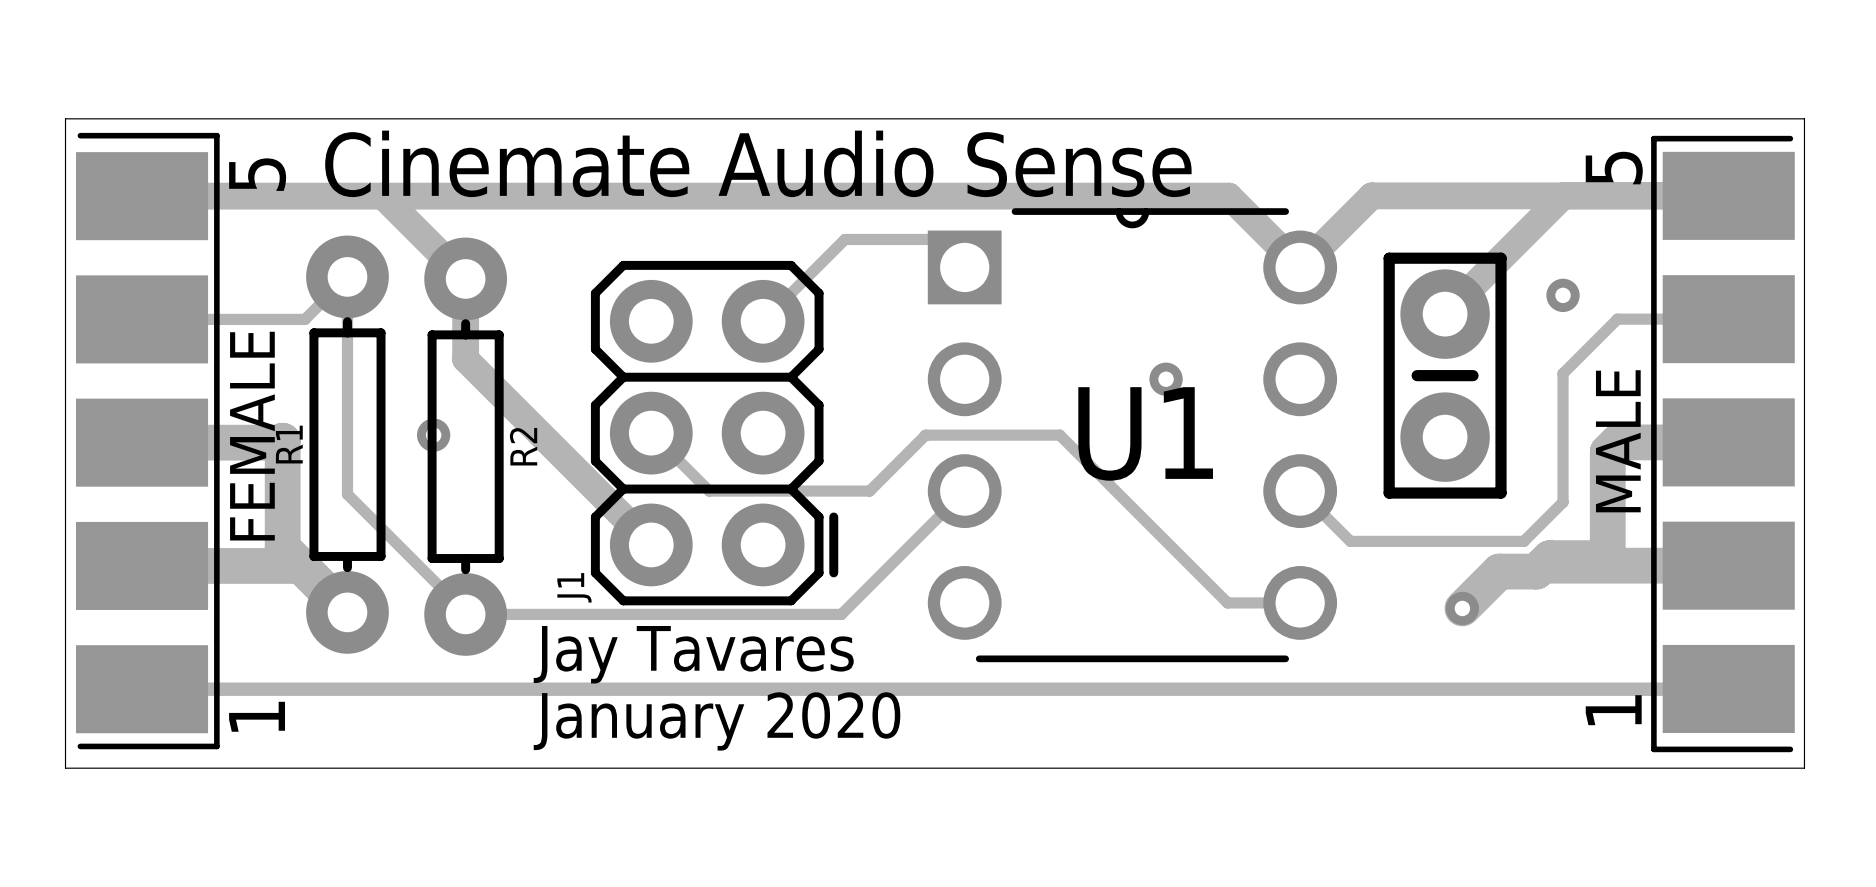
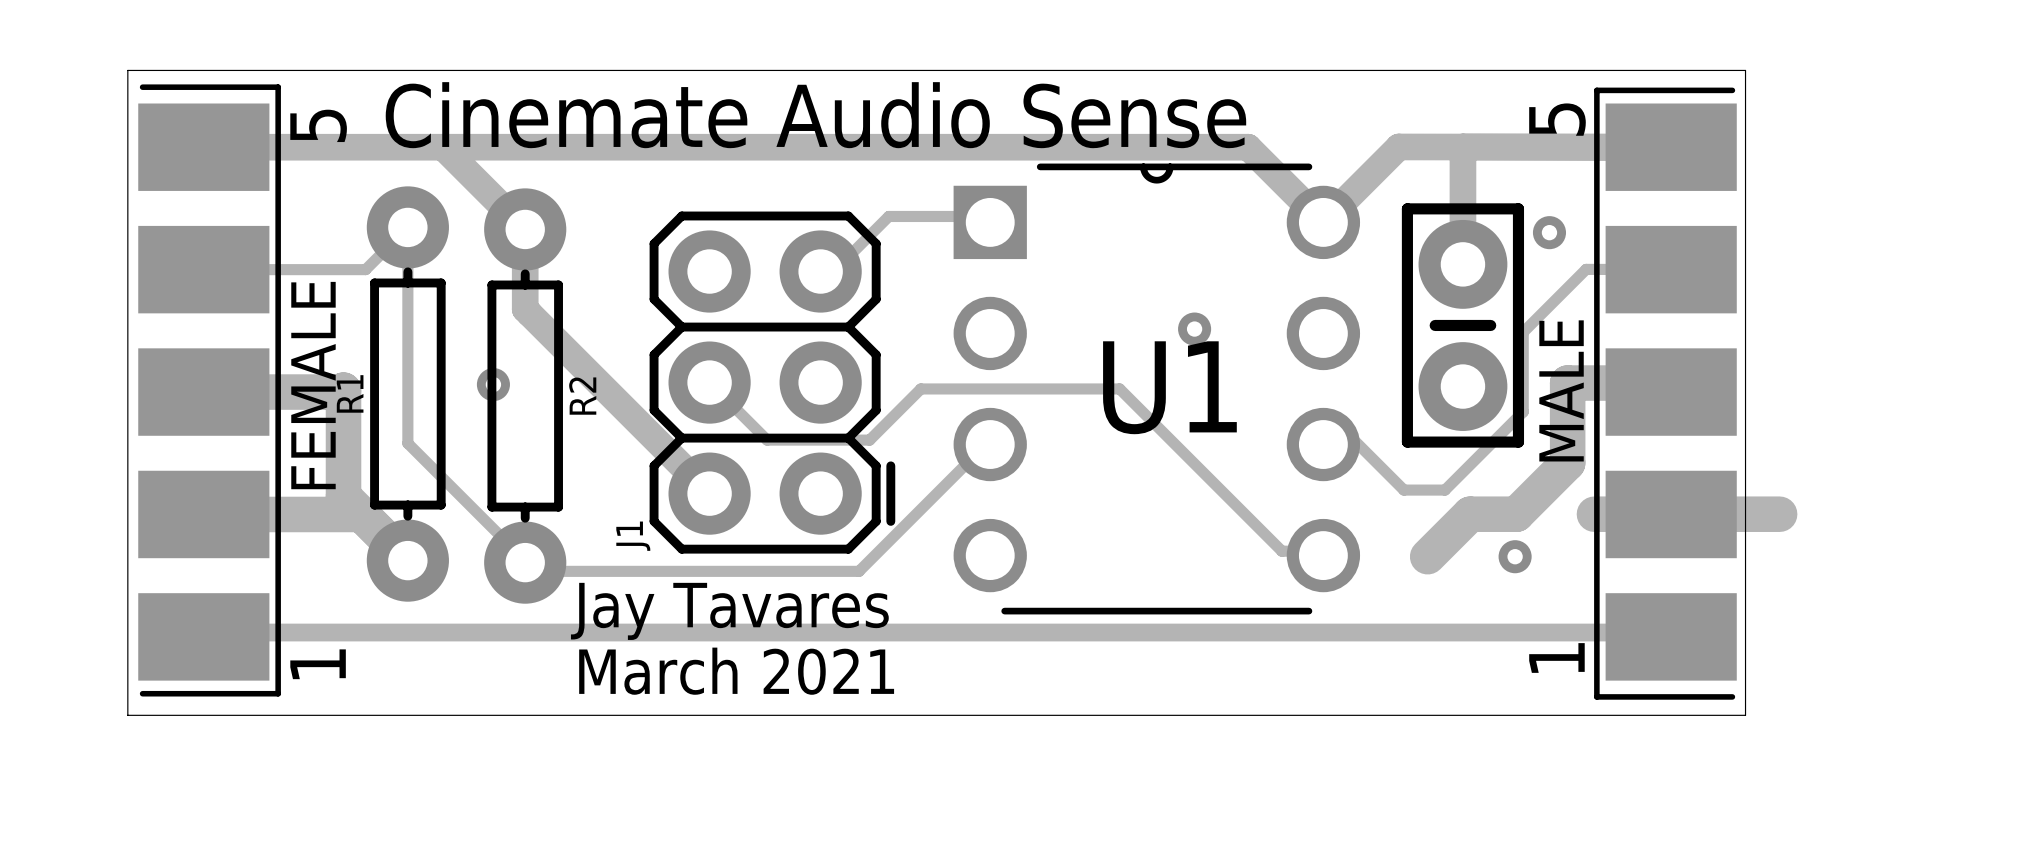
board edge: (1694, 118) (1804, 118) (1804, 768) (1694, 768) -> (1745, 70) (1745, 715)
track: (1563, 195) (1445, 314) -> none
track: (1728, 195) (1371, 195) (1300, 267) (1228, 196) (1193, 196) -> (1462, 264) (1462, 146) (1671, 147) (1398, 146) (1323, 222) (1248, 147)
track: (964, 267) (936, 239) (844, 239) (763, 321) -> (990, 222) (984, 216) (888, 216) (833, 271) (820, 271)
via position: (1563, 295) -> (1549, 232)
track: (1728, 319) (1617, 319) (1563, 373) (1563, 502) (1523, 541) (1391, 541) -> (1671, 269) (1586, 269) (1523, 332) (1523, 411) (1445, 490)
part position: (1445, 375) -> (1462, 325)
via position: (1166, 379) -> (1194, 329)
U1 position: (1132, 435) -> (1156, 388)
track: (1064, 439) (1059, 435) (925, 435) (869, 491) (812, 491) -> (1119, 388) (920, 388) (869, 440)
track: none -> (1671, 392) (1662, 383) (1567, 383) (1567, 463) (1516, 514) (1470, 514) (1427, 556)
track: (1728, 442) (1617, 442) (1607, 451) (1607, 558) (1549, 558) (1536, 571) (1499, 571) (1462, 608) -> none
part position: (1722, 444) -> (1665, 393)
track: (964, 491) (841, 614) (465, 614) (463, 610) -> (990, 444) (985, 444) (859, 571) (542, 571) (529, 558) (522, 558)
text position: Jay Tavares (693, 654) -> Jay Tavares (729, 611)
track: (142, 689) (1728, 689) -> (202, 636) (206, 632) (1653, 632) (1671, 636)
text: January 2020 (717, 721) -> March 2021 (736, 671)

